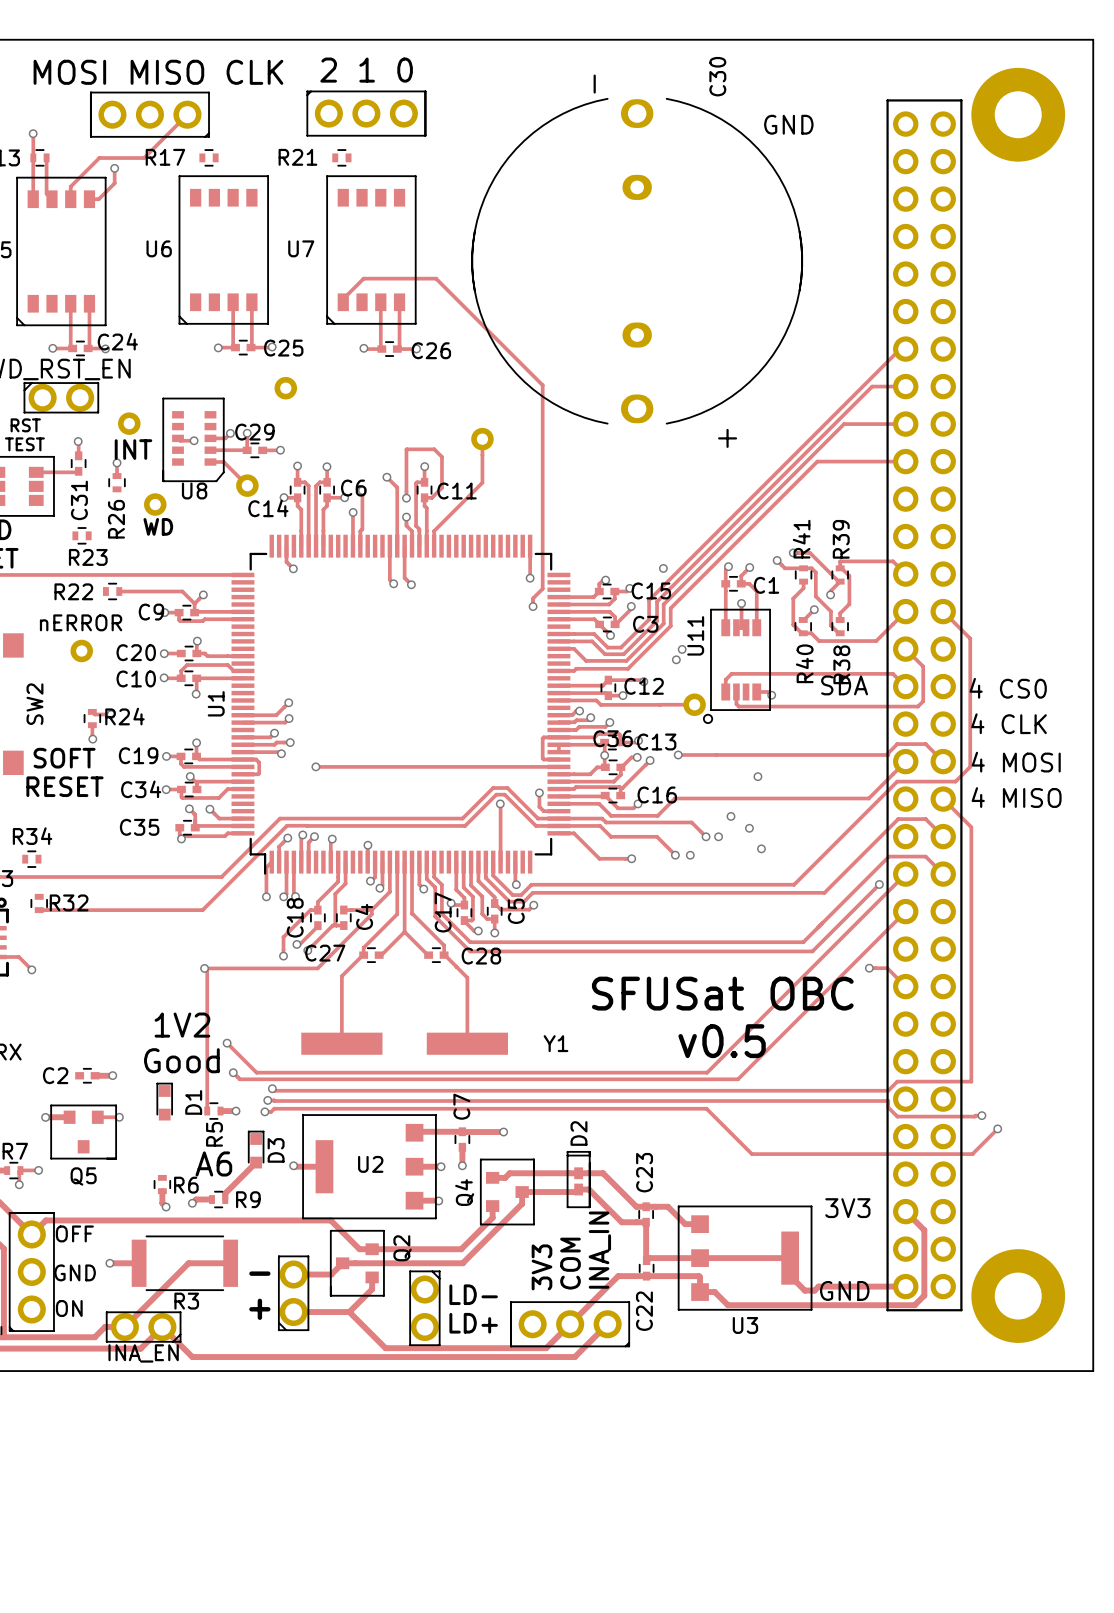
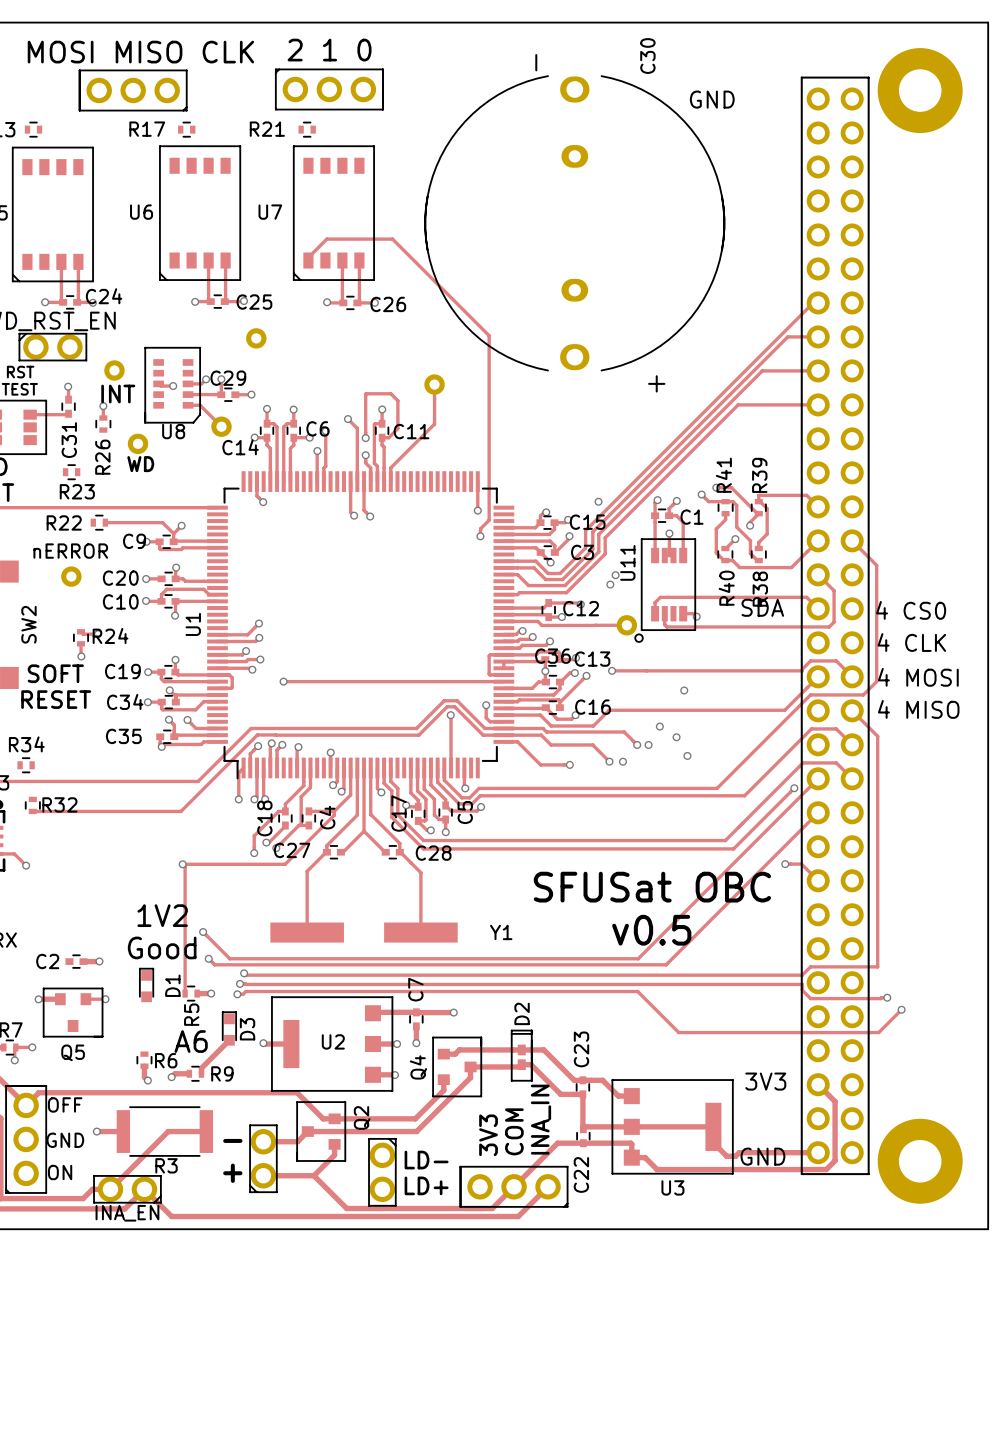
track: (187, 114) (144, 158) (99, 158) (70, 186) (70, 199) -> none
track: (33, 133) (33, 157) -> none
via: (33, 133) -> none
track: (33, 157) (33, 199) -> none
track: (46, 157) (46, 193) (51, 199) -> none
track: (114, 168) (114, 183) (98, 199) (89, 199) -> none
via: (114, 168) -> none

